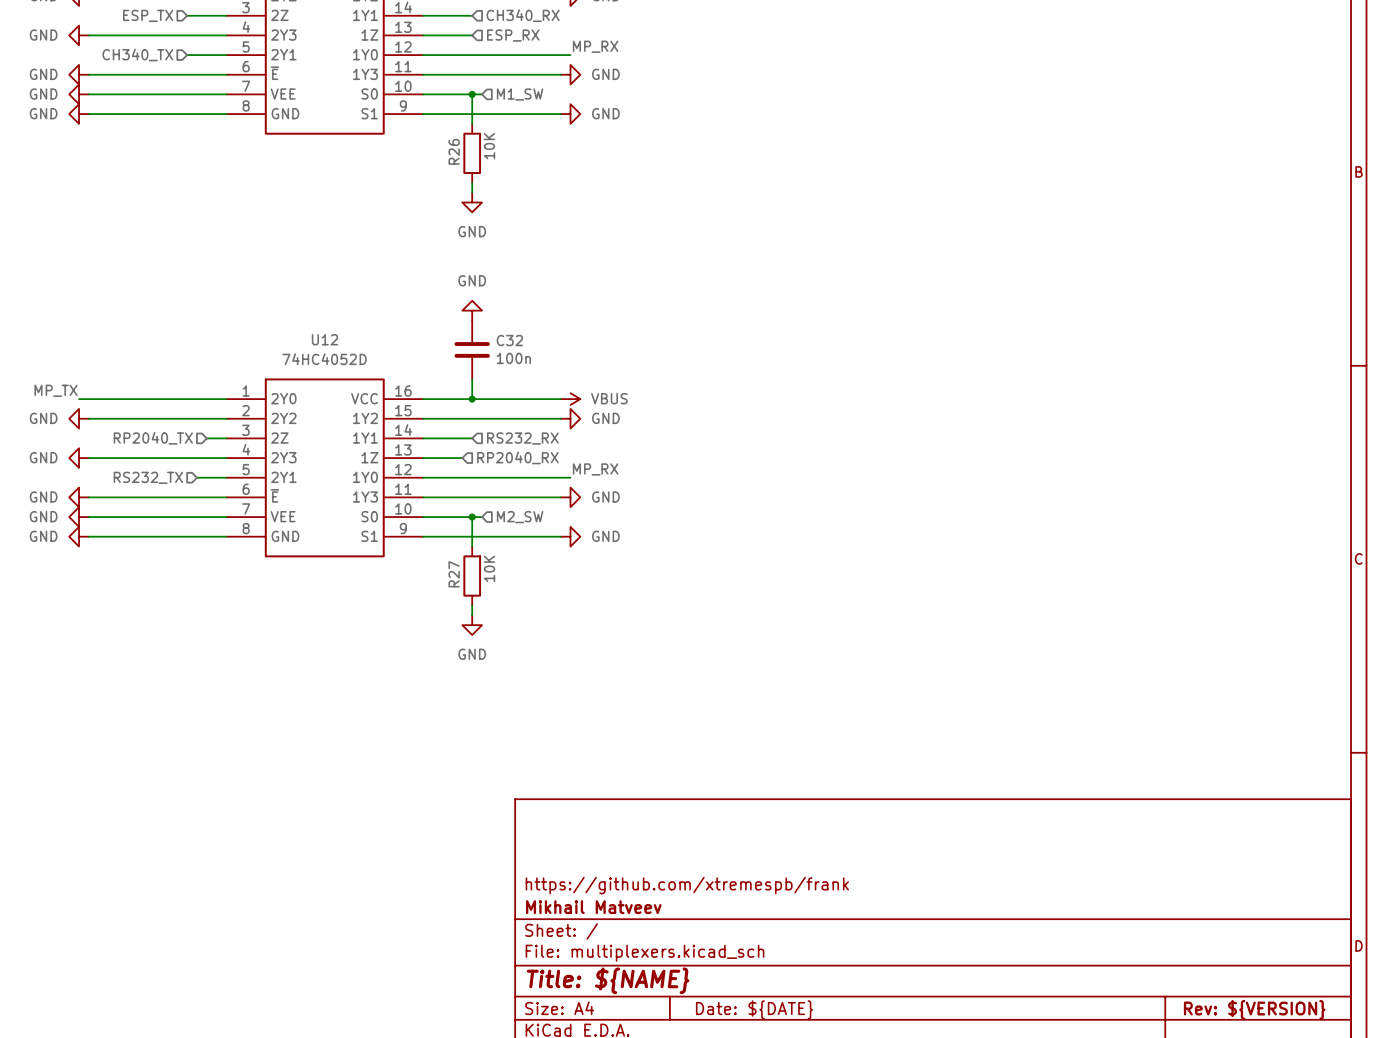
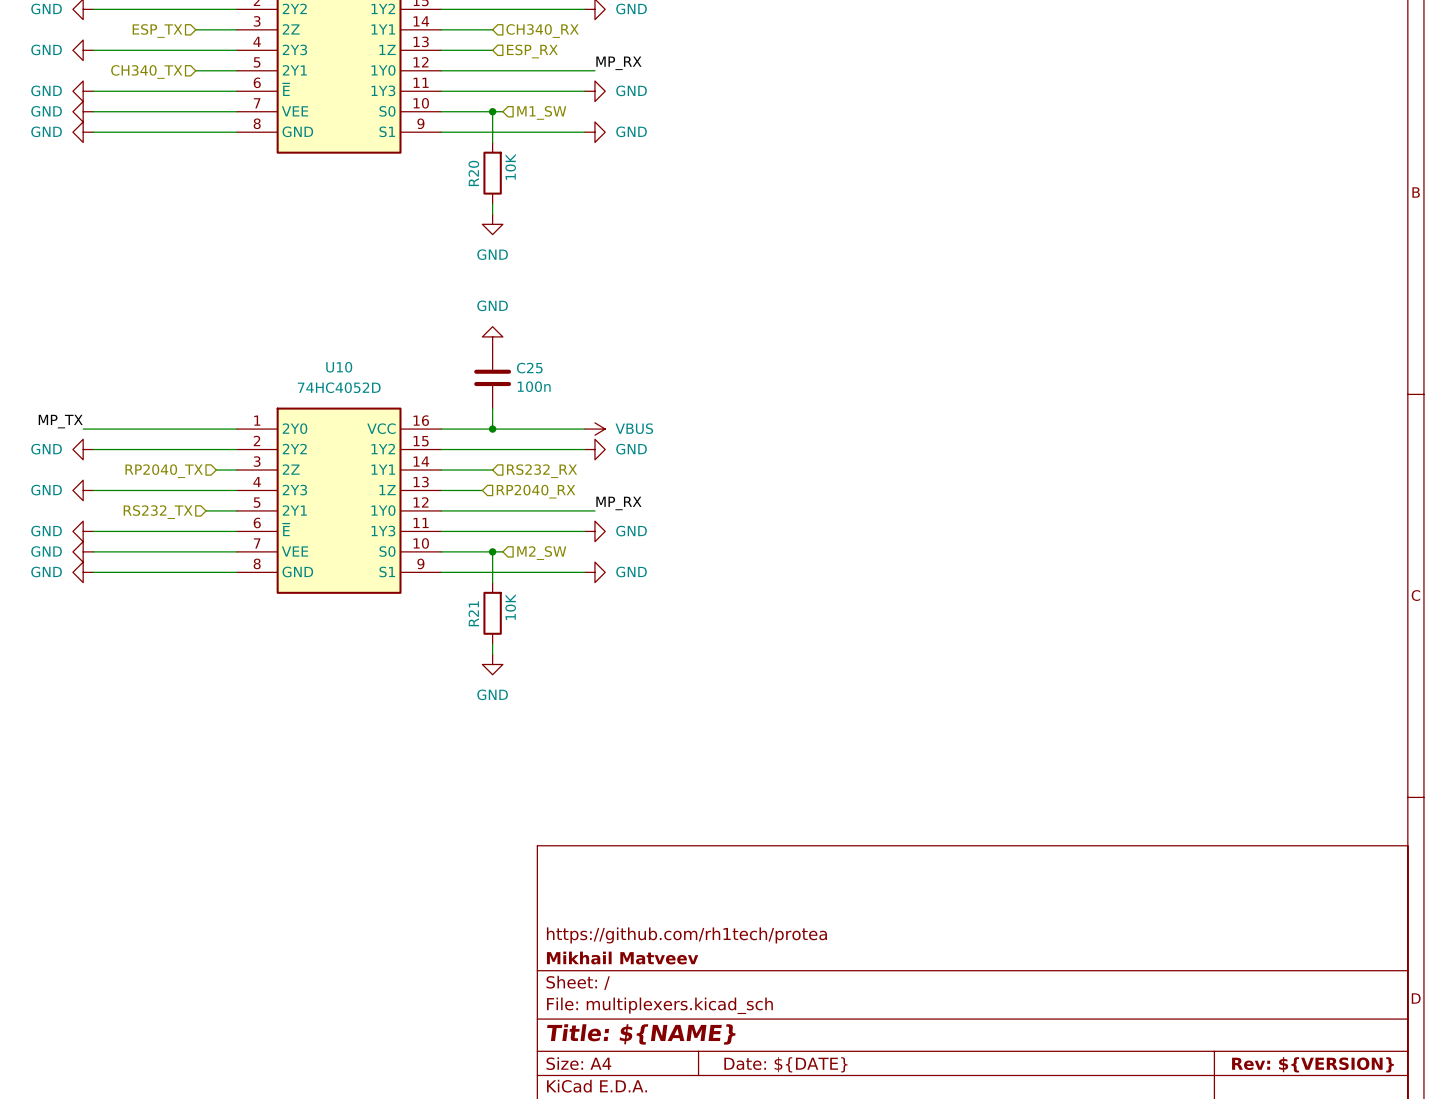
R26 name: R26 (454, 151) -> R20 (473, 173)
U12 name: U12 (324, 339) -> U10 (339, 367)
C32 name: C32 (509, 340) -> C25 (529, 368)
R27 name: R27 (454, 574) -> R21 (473, 613)
title block: https://github.com/xtremespb/frank (687, 885) -> https://github.com/rh1tech/protea (686, 935)

